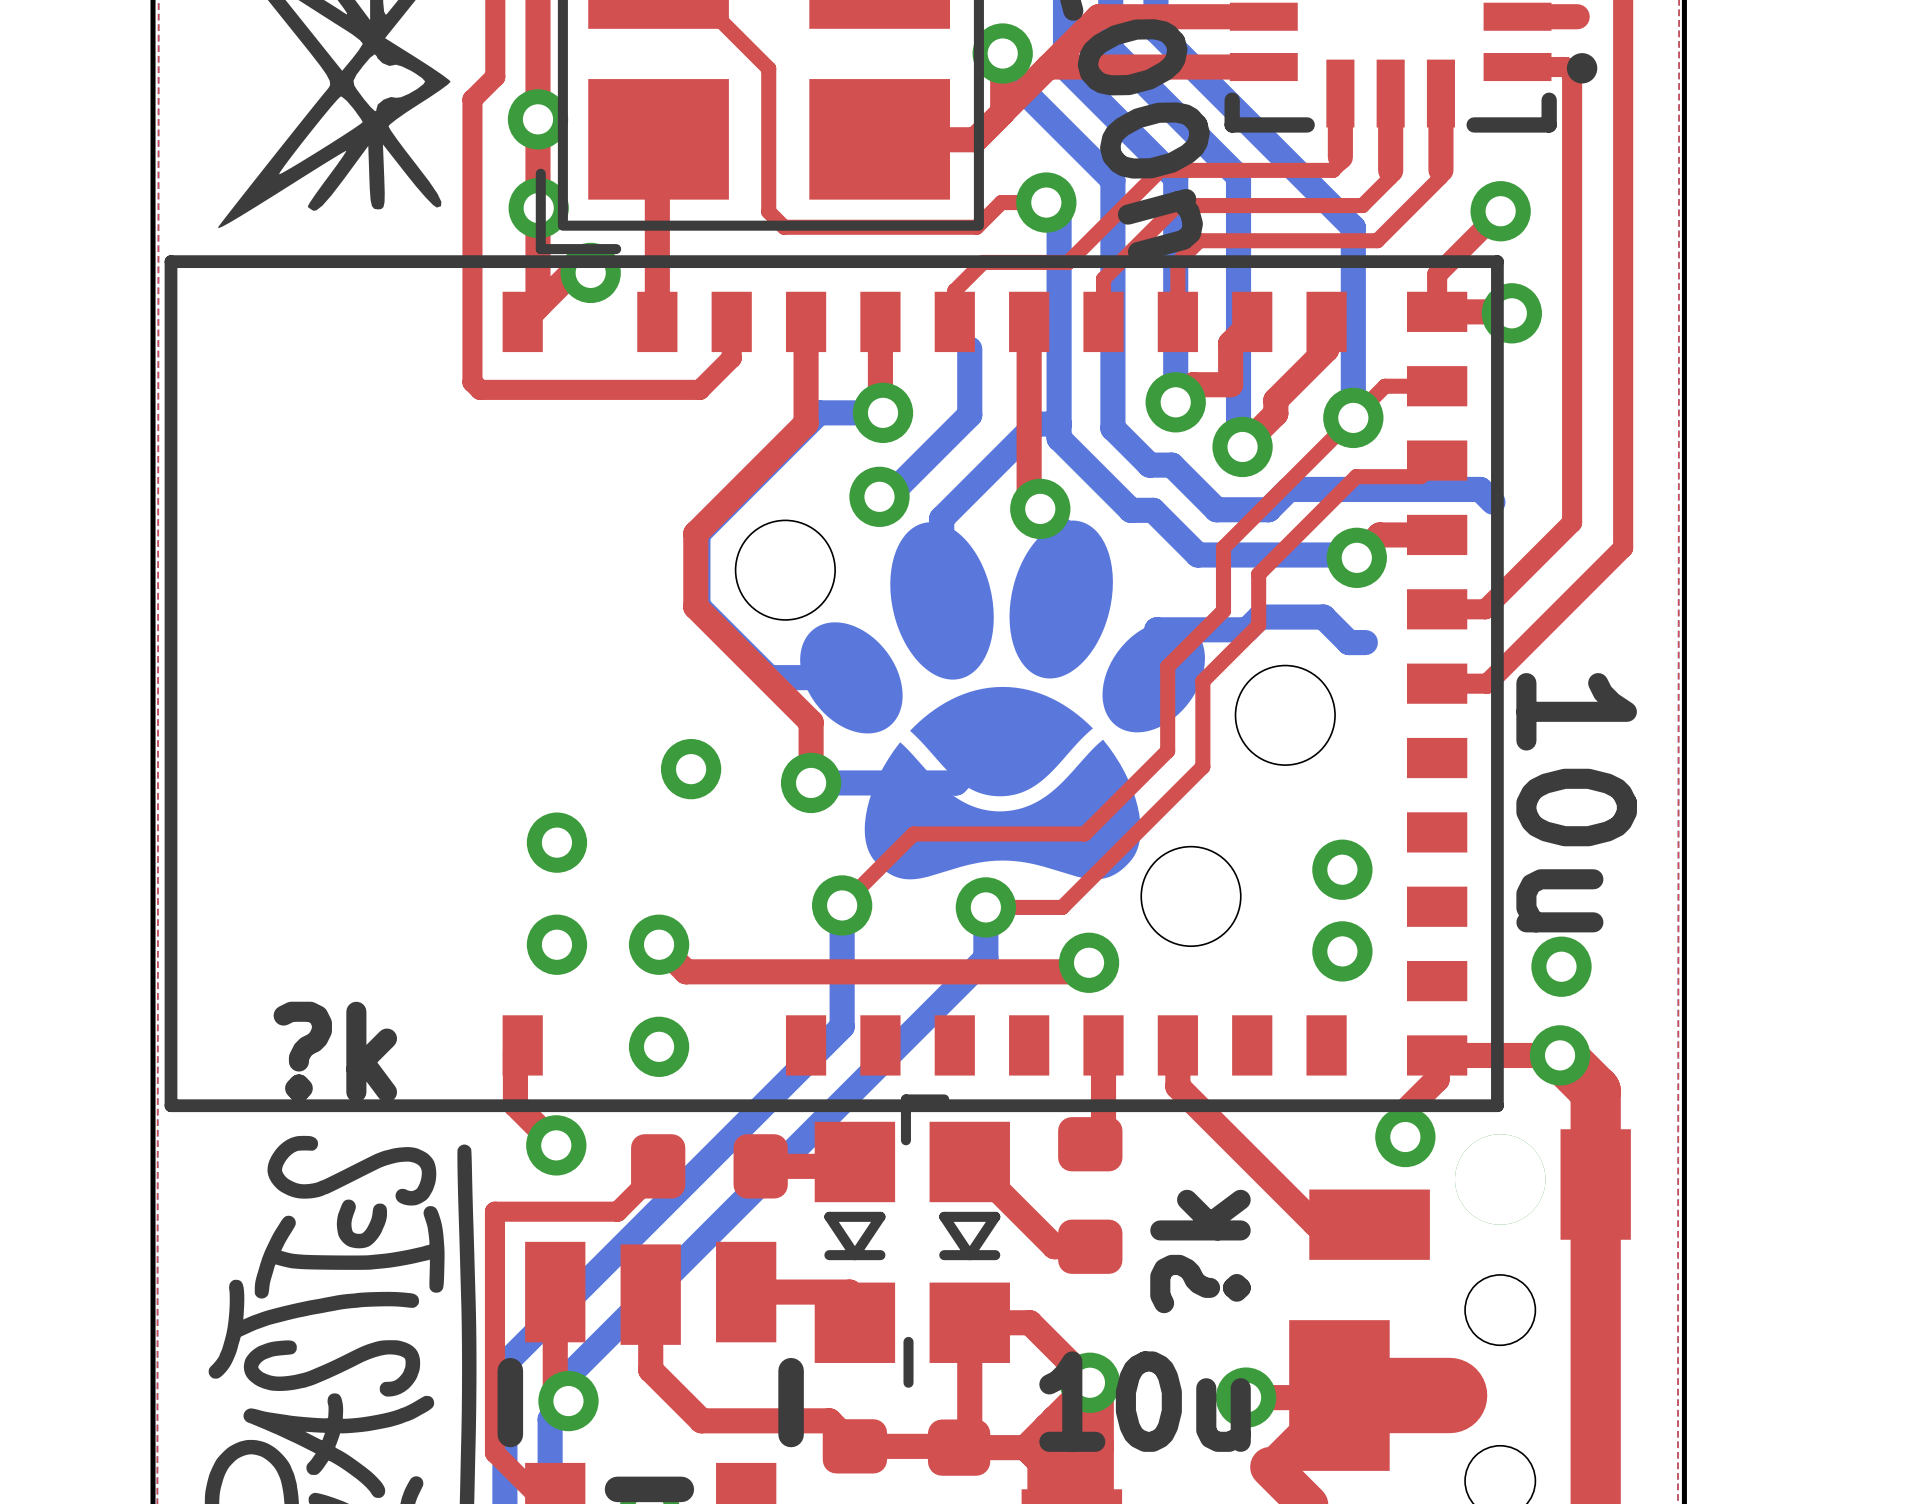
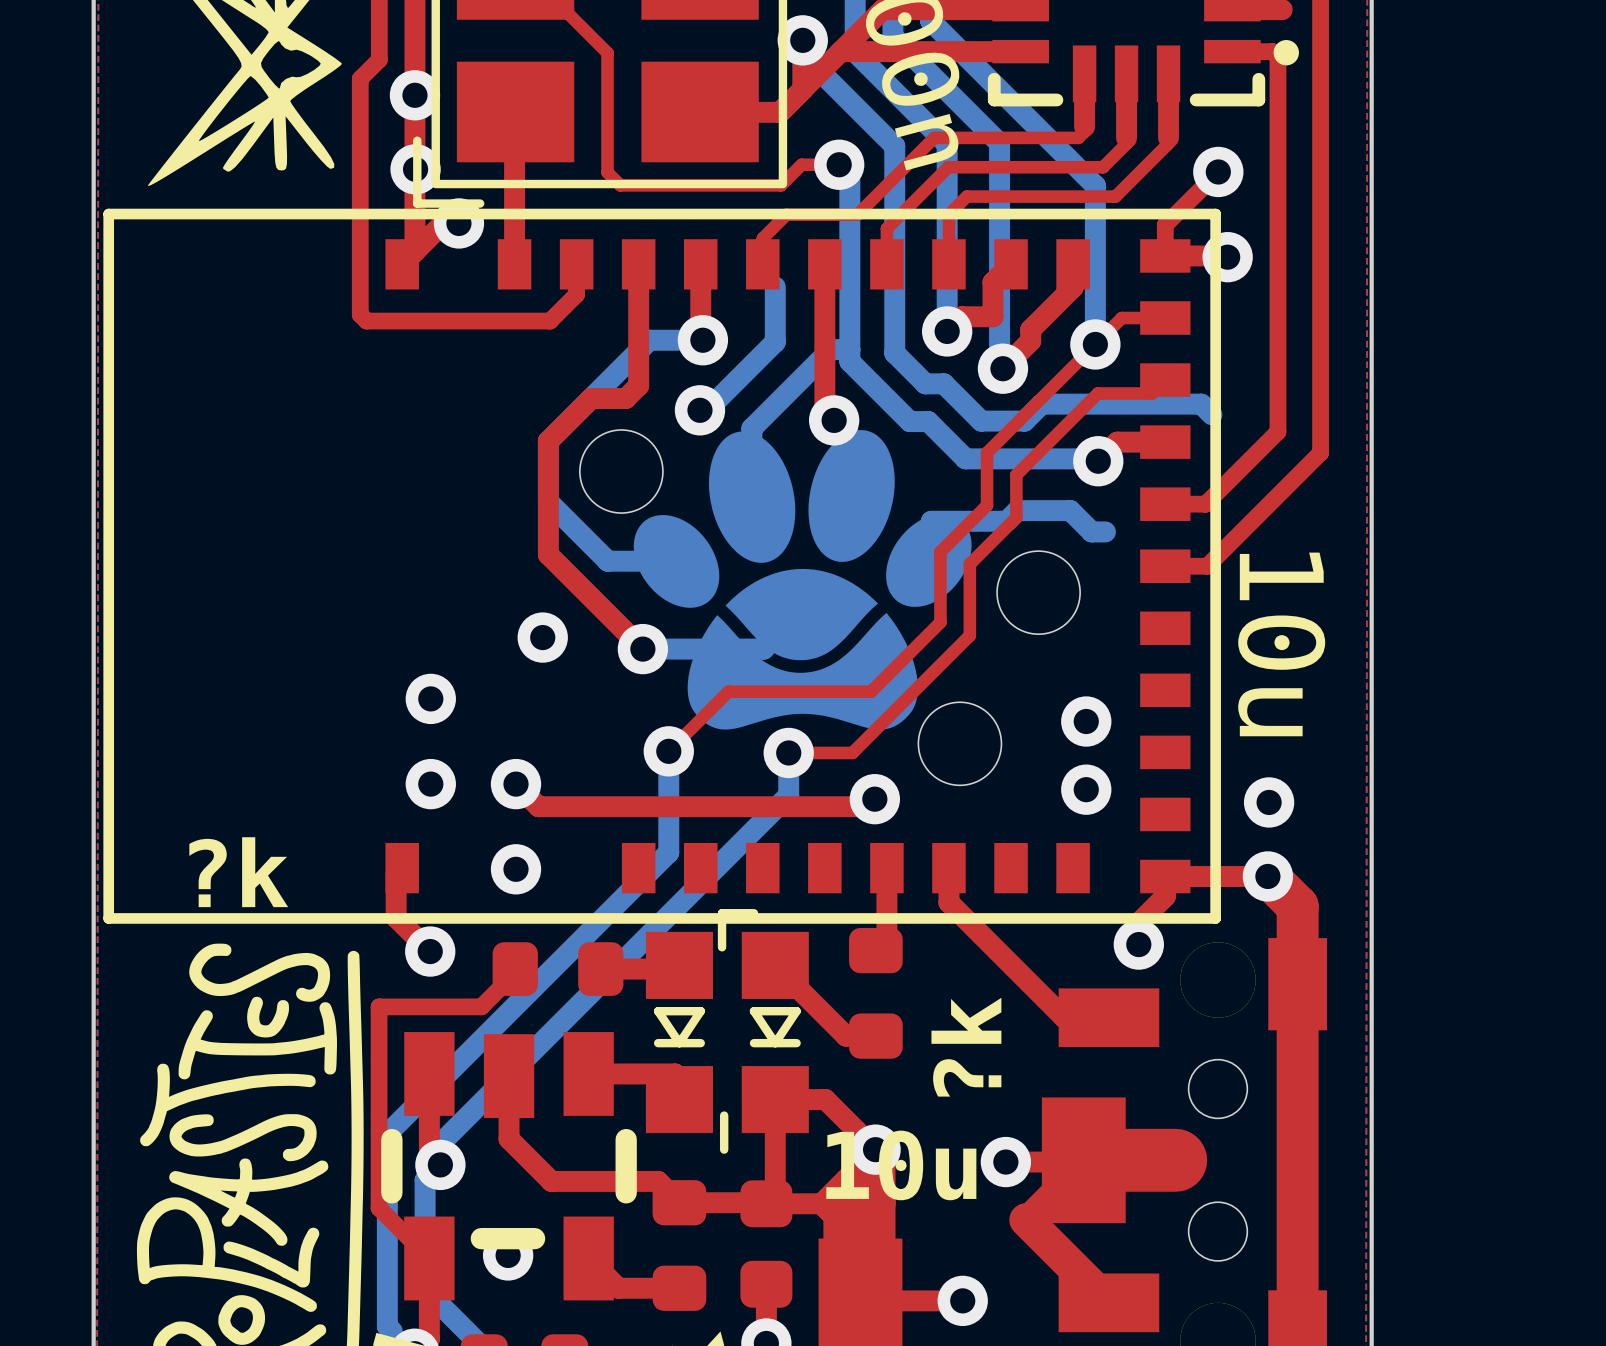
top track: (806, 423) (695, 533) (695, 606) (811, 722) (811, 782) -> (638, 349) (638, 385) (625, 398) (591, 398) (548, 441) (548, 554) (642, 649)

